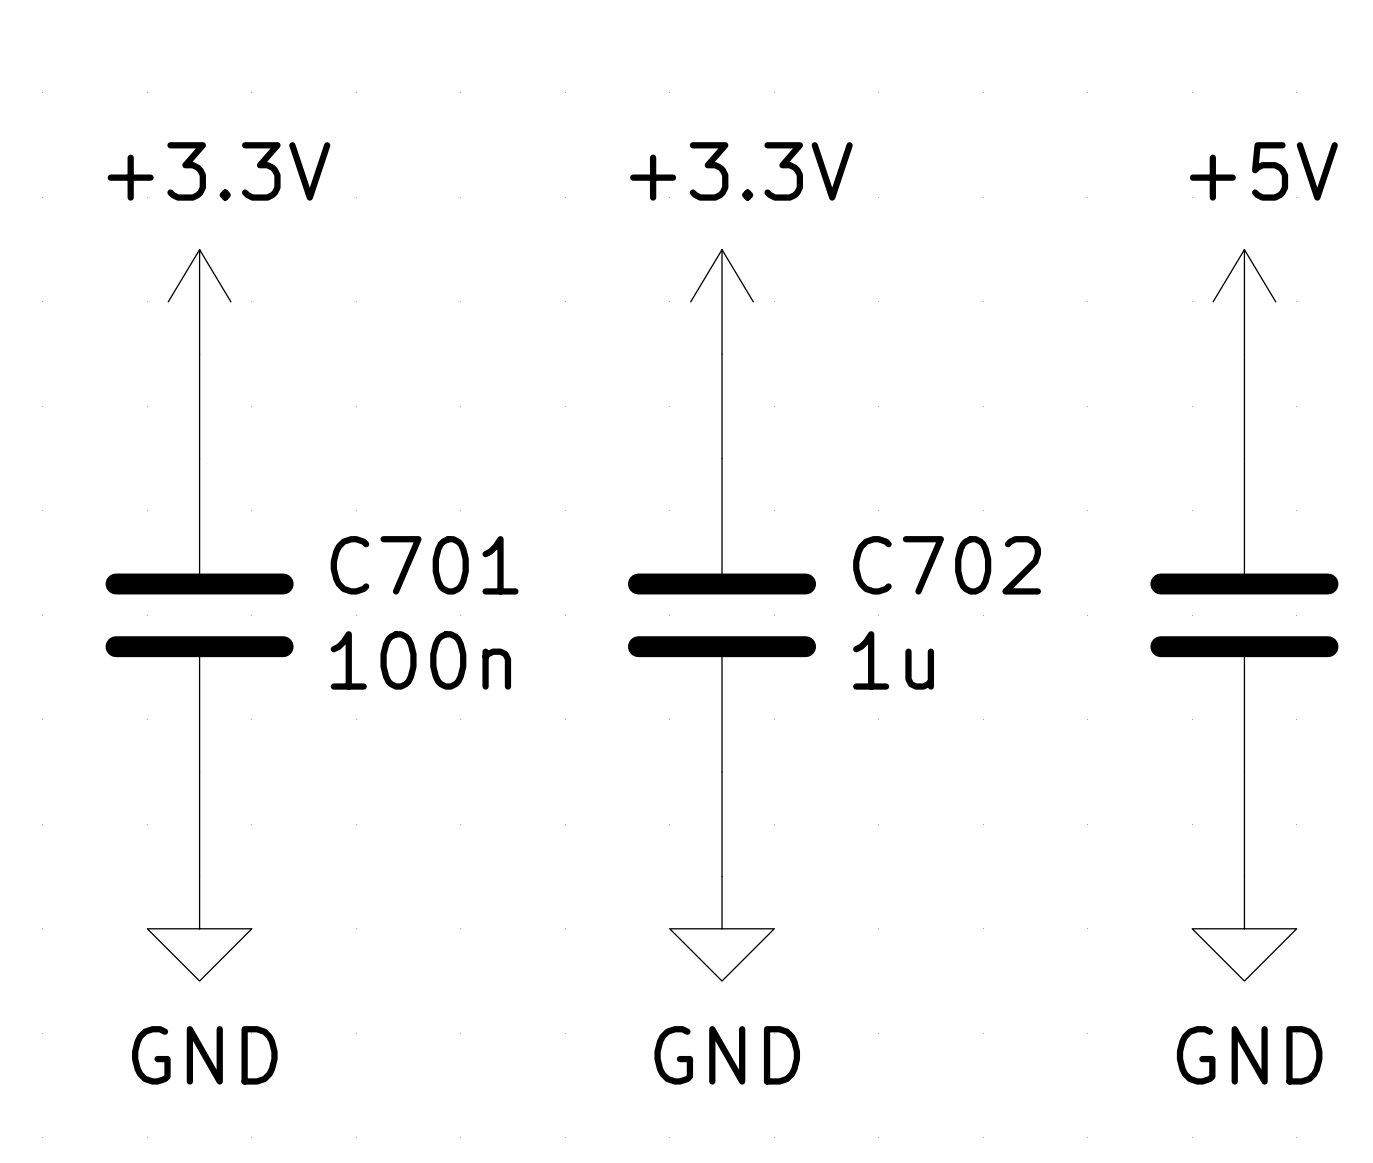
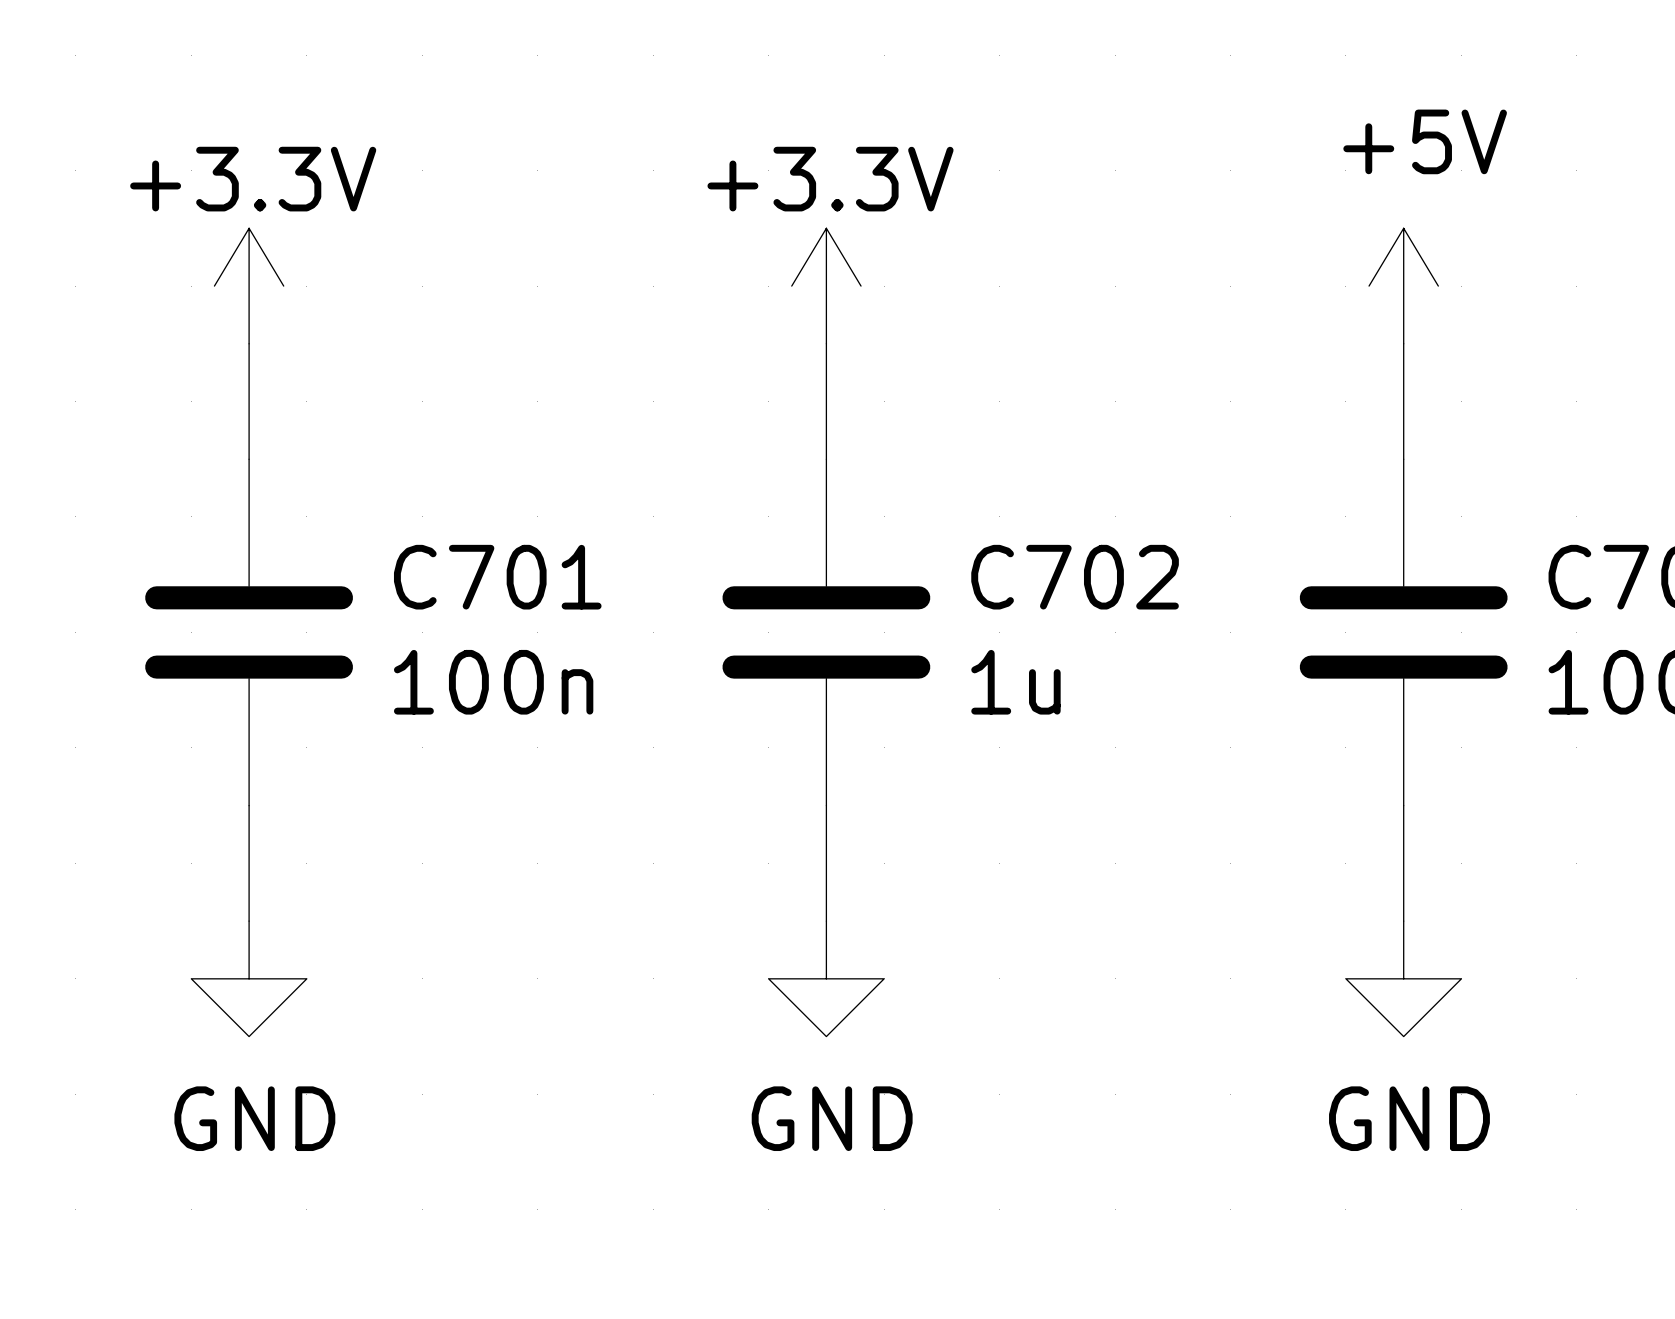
power symbol text position: +3.3V (218, 171) -> +3.3V (253, 179)
power symbol text position: +3.3V (741, 171) -> +3.3V (830, 179)

